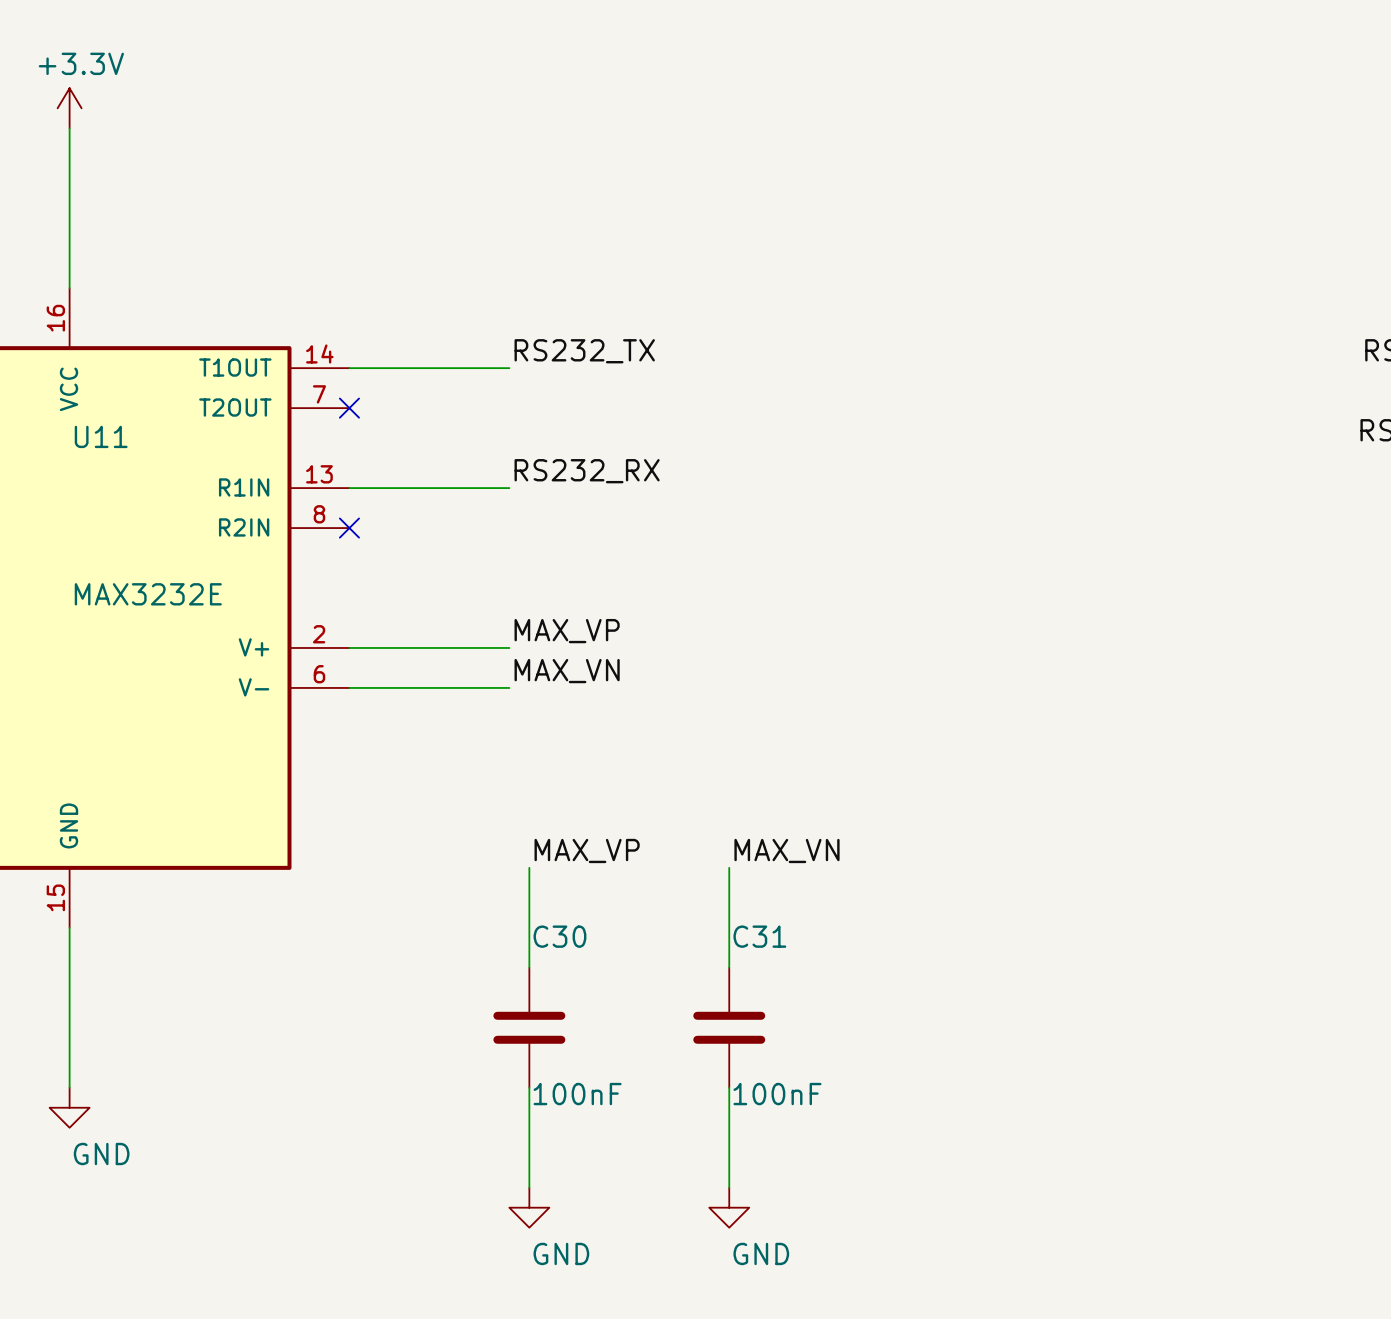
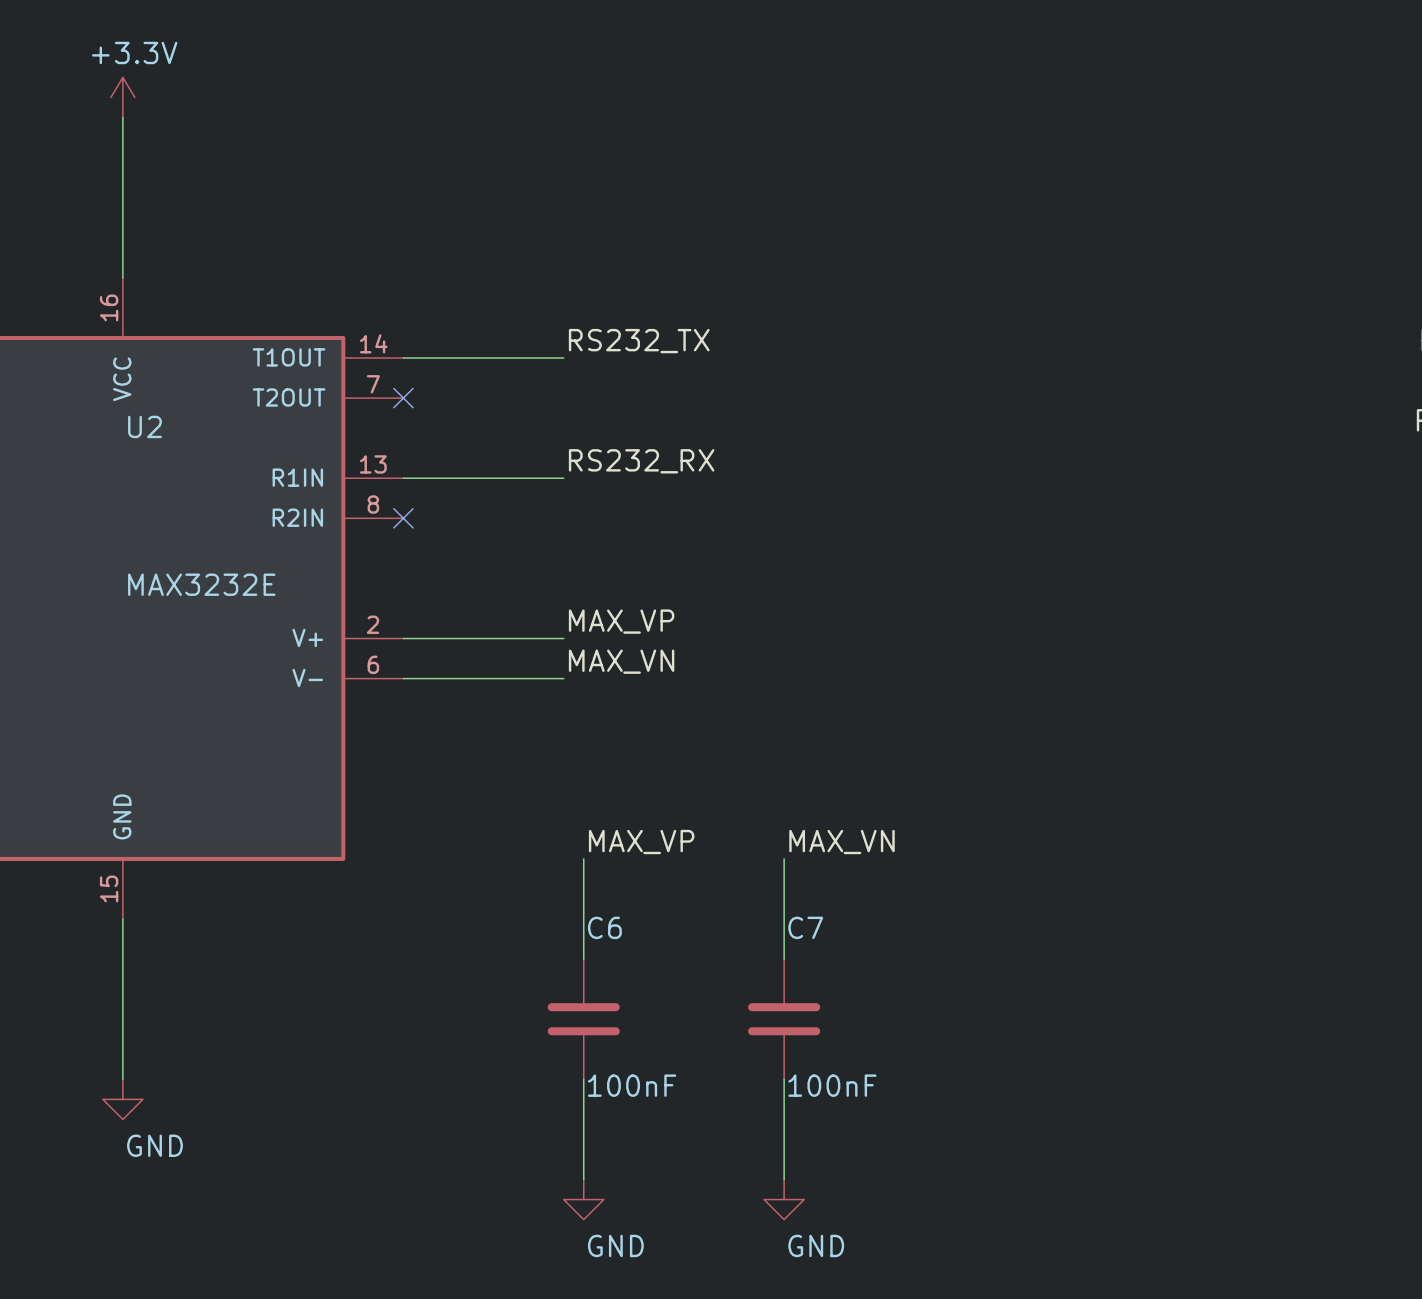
U11 name: U11 (101, 436) -> U2 (144, 426)
C30 name: C30 (559, 936) -> C6 (604, 927)
C31 name: C31 (759, 936) -> C7 (805, 927)

